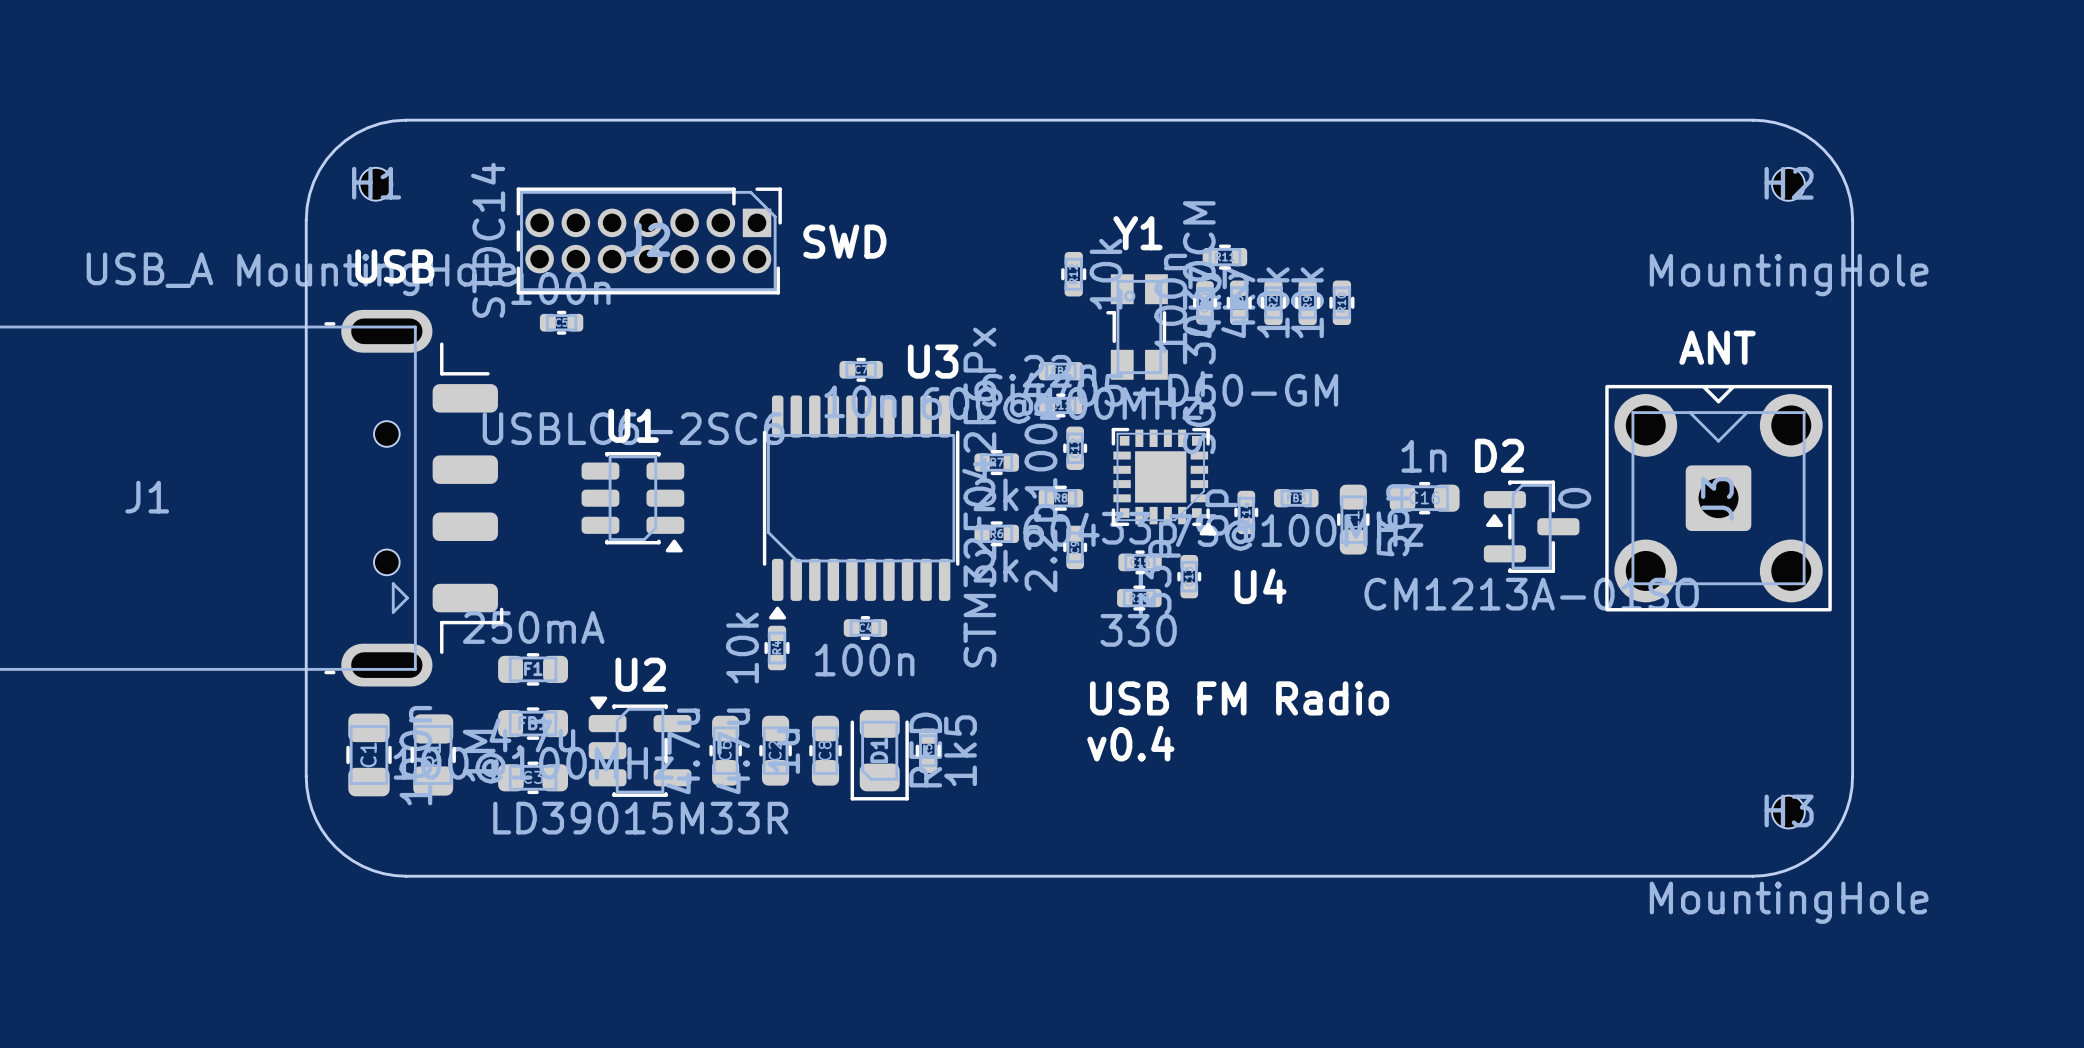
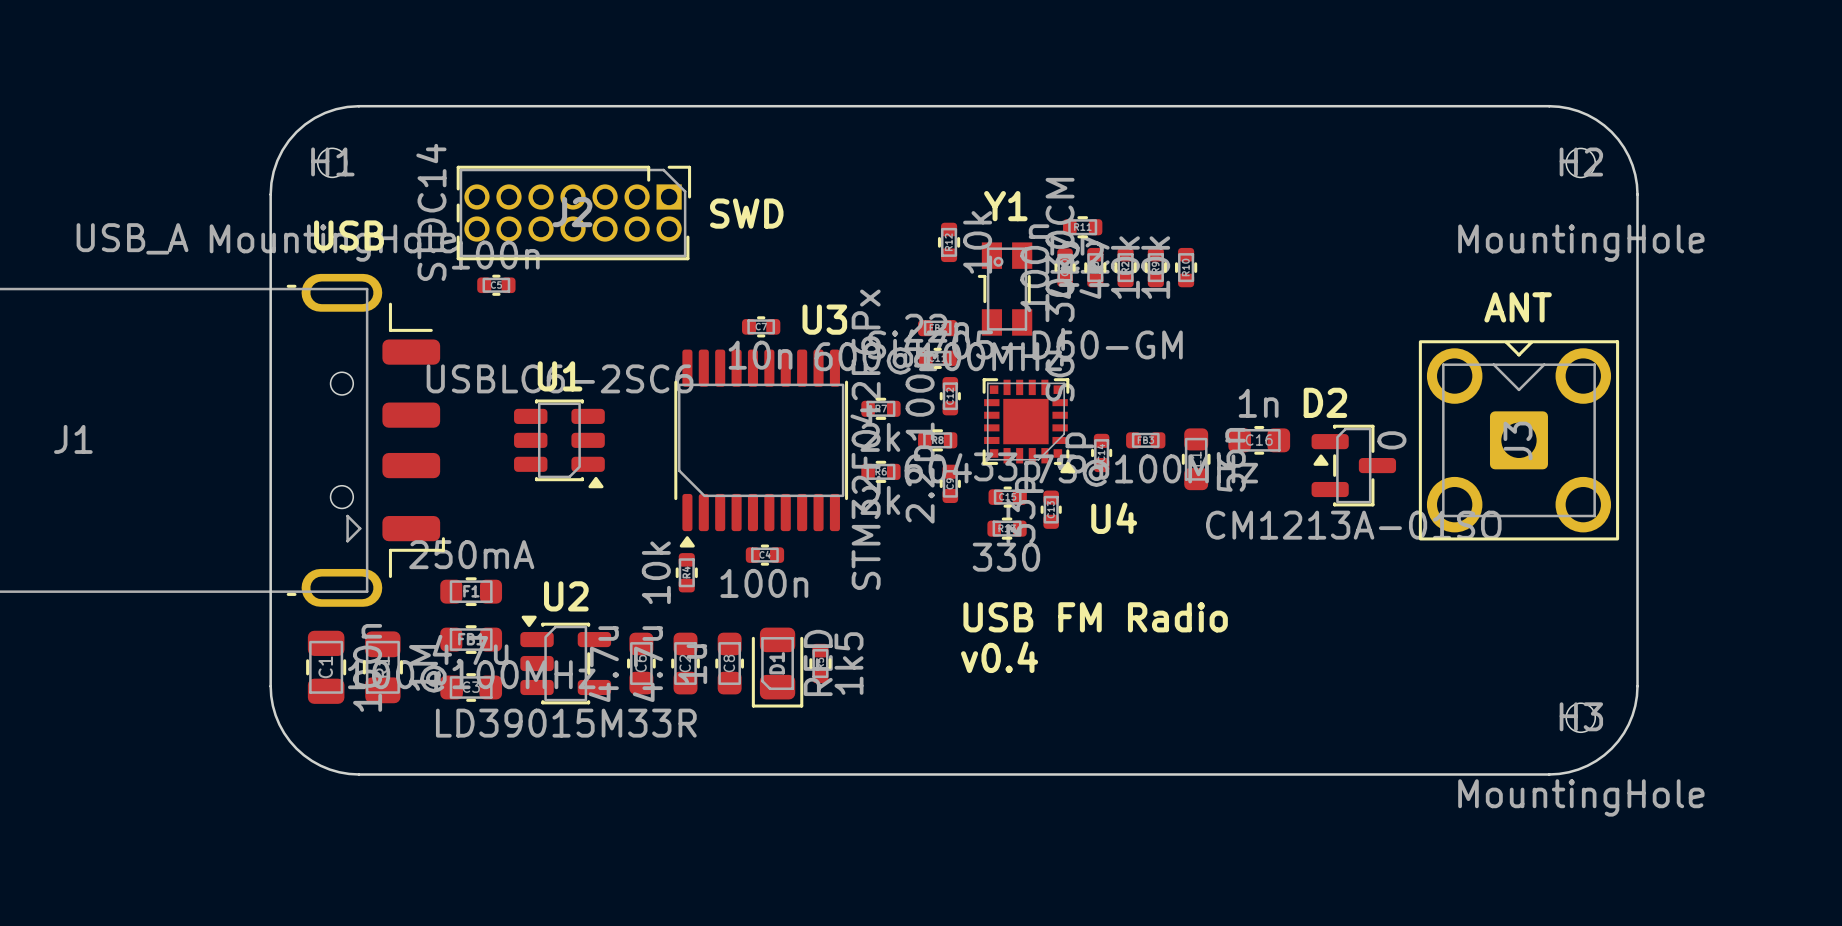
J1 name position: J1 (147, 497) -> J1 (73, 439)

